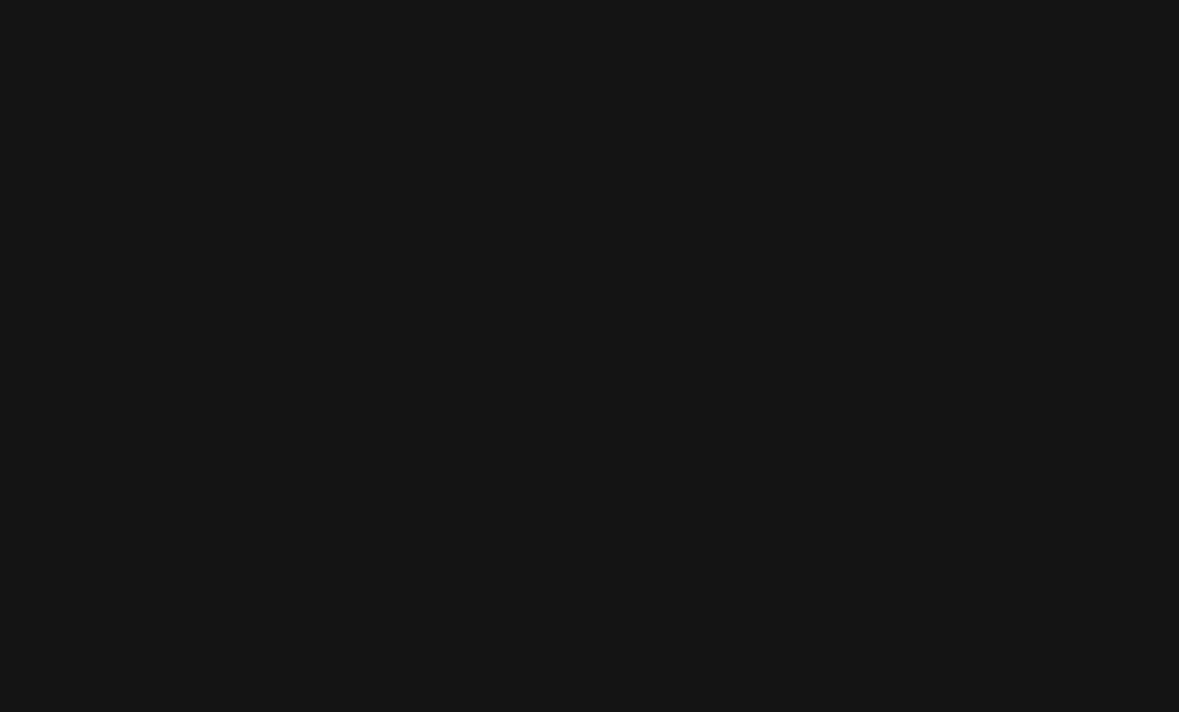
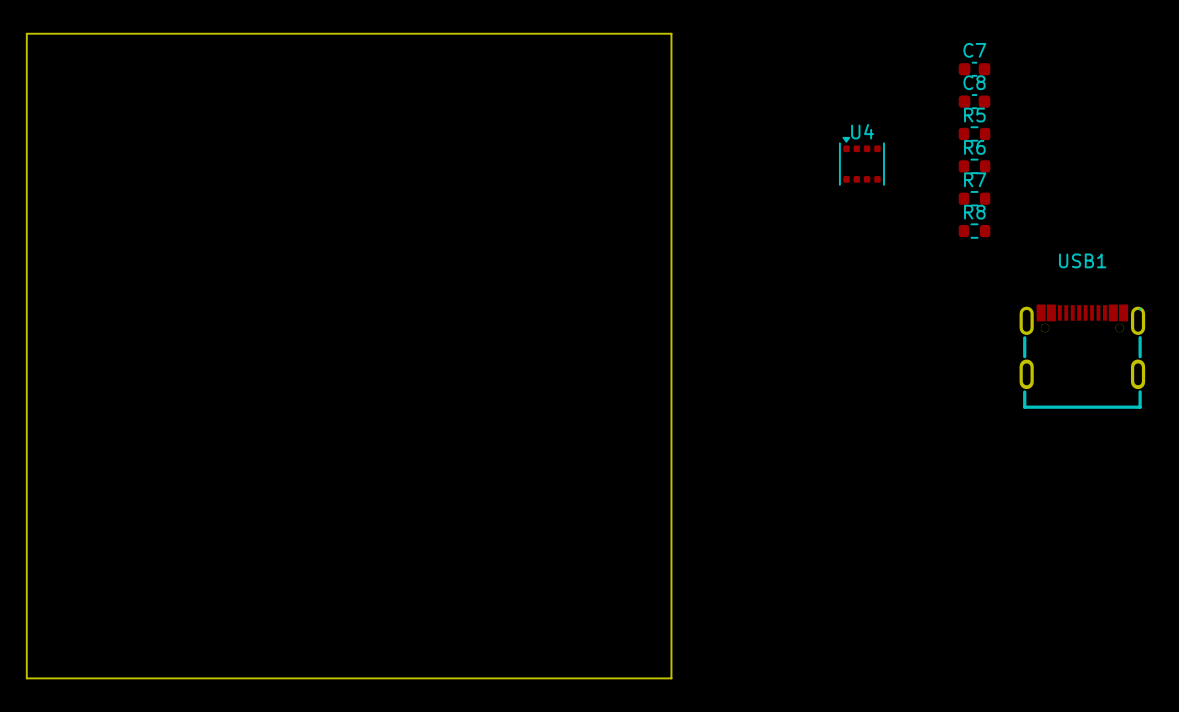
board edge: none -> (26, 33) (671, 33) (671, 678) (26, 678) (26, 33)
C7: none -> (974, 69)
C8: none -> (974, 101)
R5: none -> (974, 133)
U4: none -> (861, 161)
R6: none -> (974, 166)
R7: none -> (974, 198)
R8: none -> (974, 231)
USB1: none -> (1082, 356)

